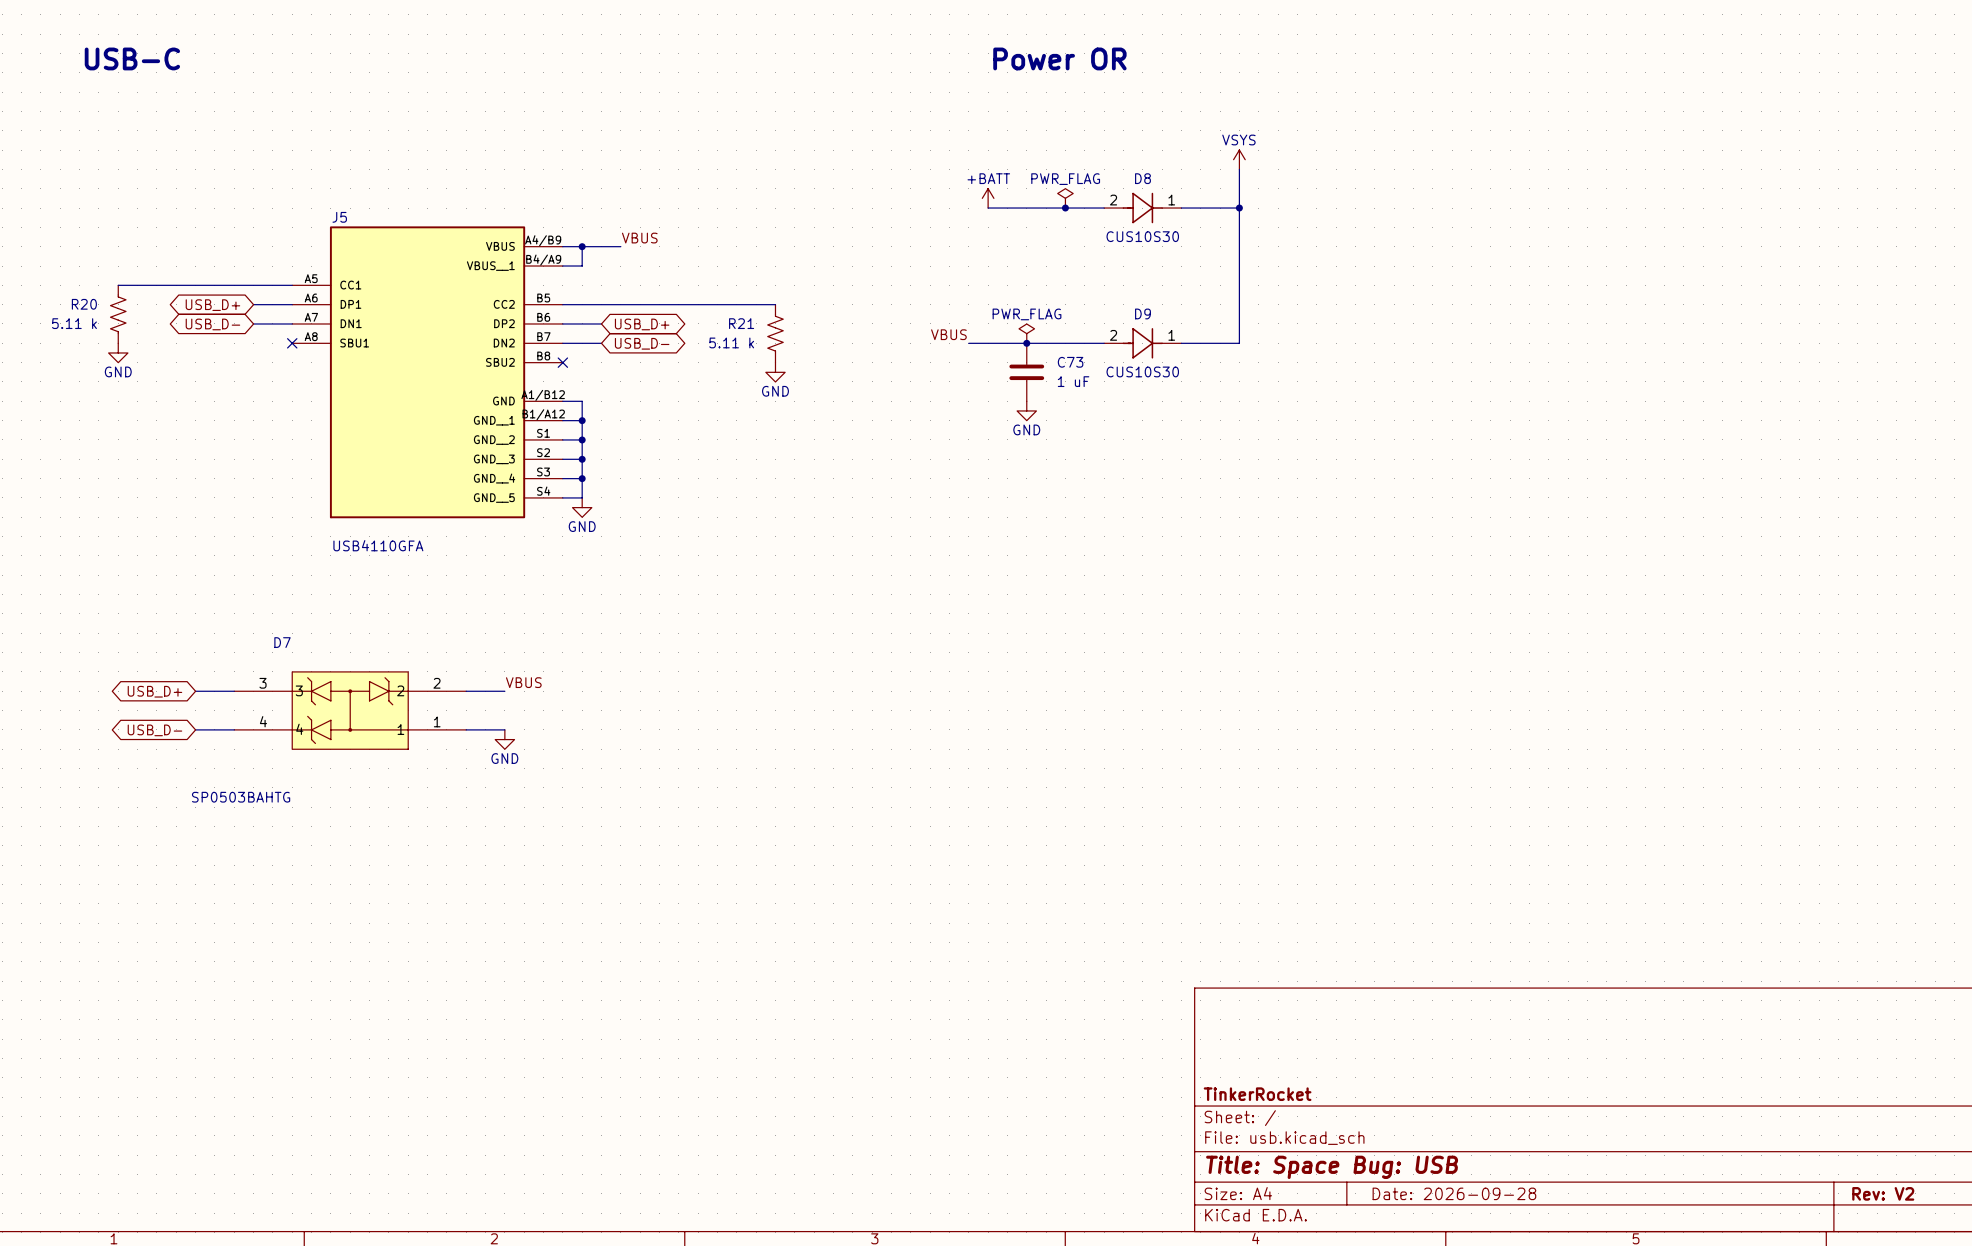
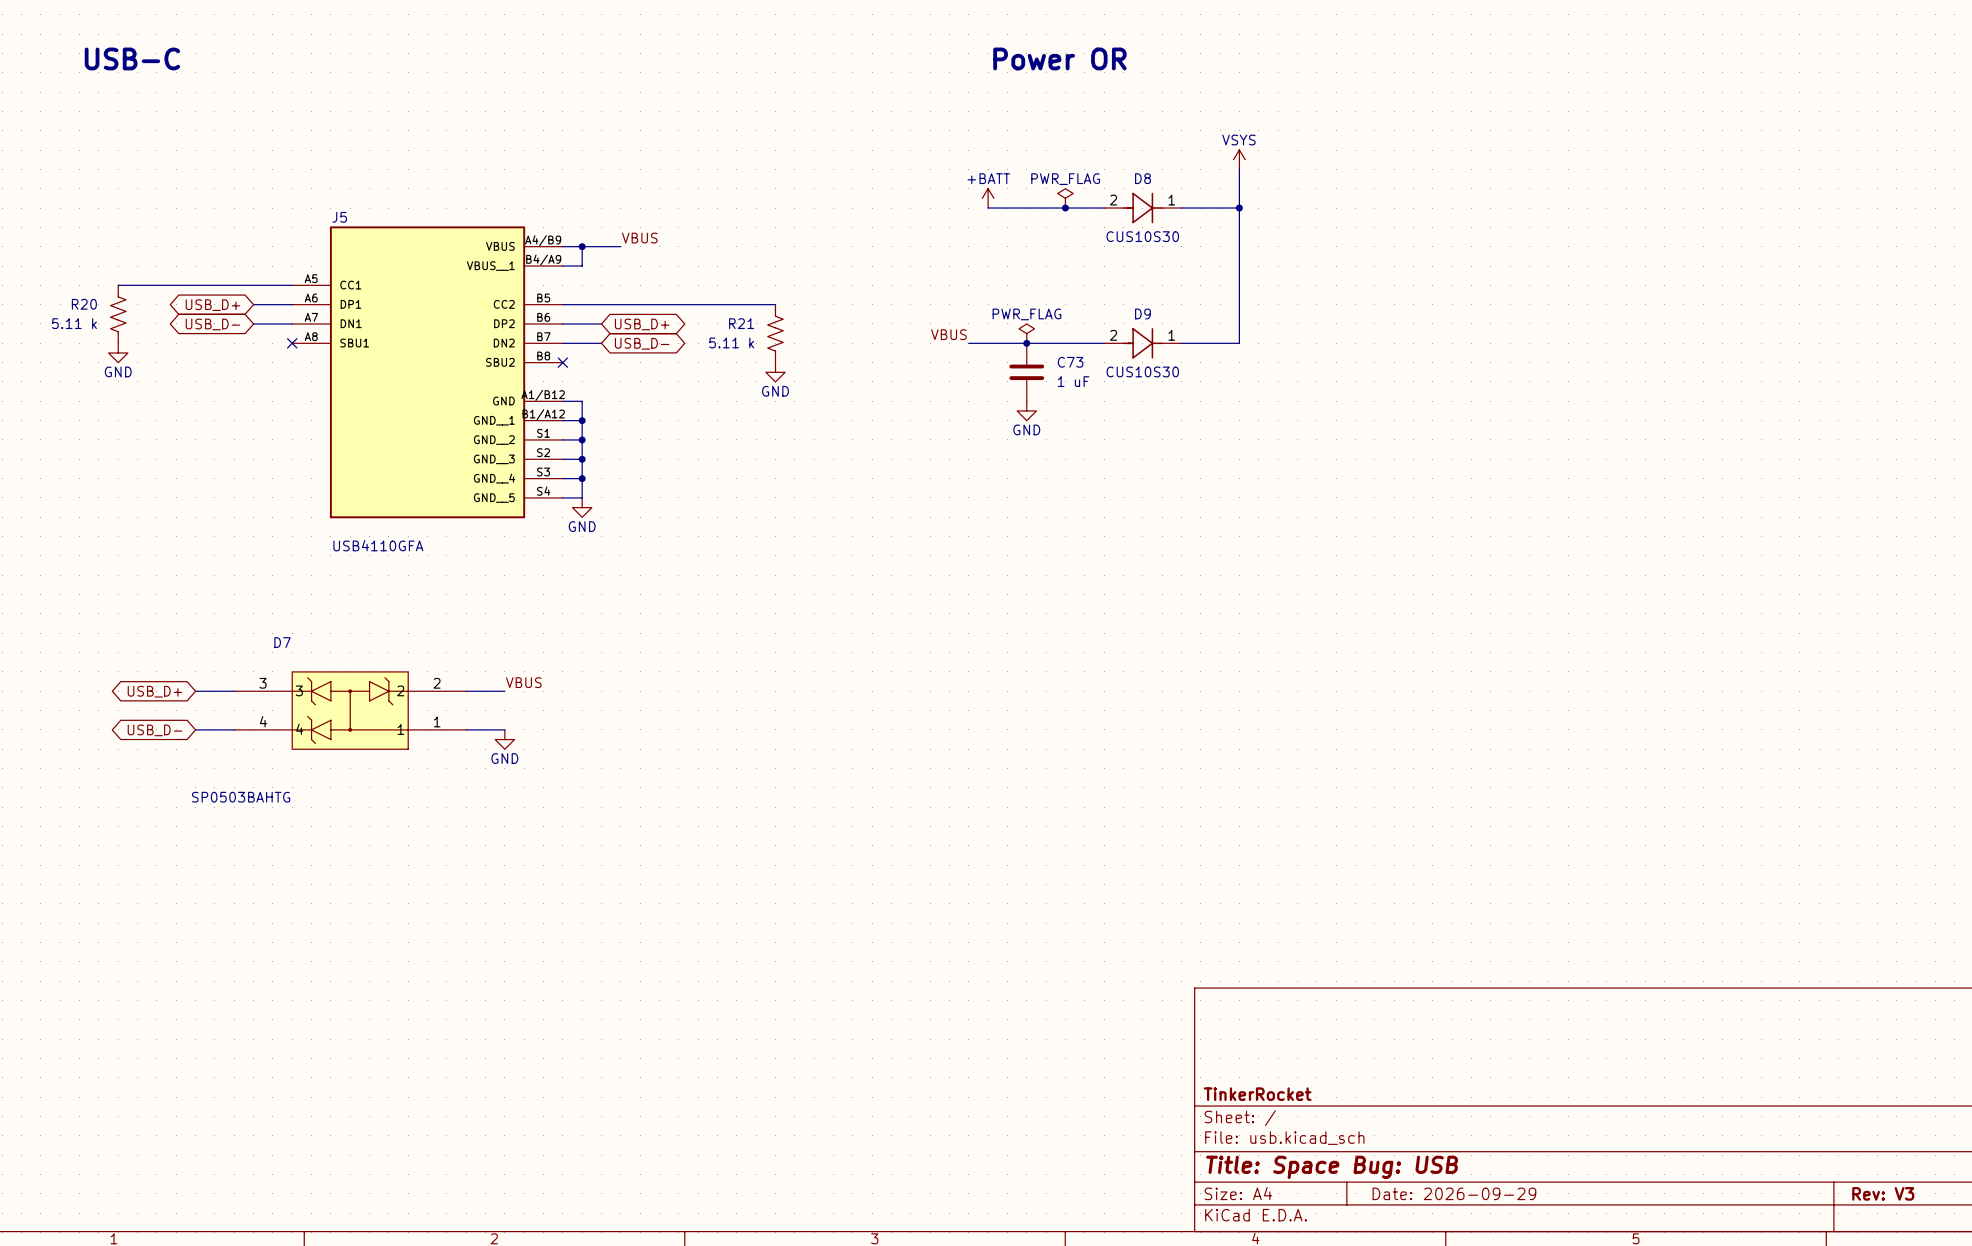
title block: Date: 2026-09-28 (1454, 1193) -> Date: 2026-09-29 (1454, 1193)
title block: Rev: V2 (1883, 1193) -> Rev: V3 (1883, 1193)

